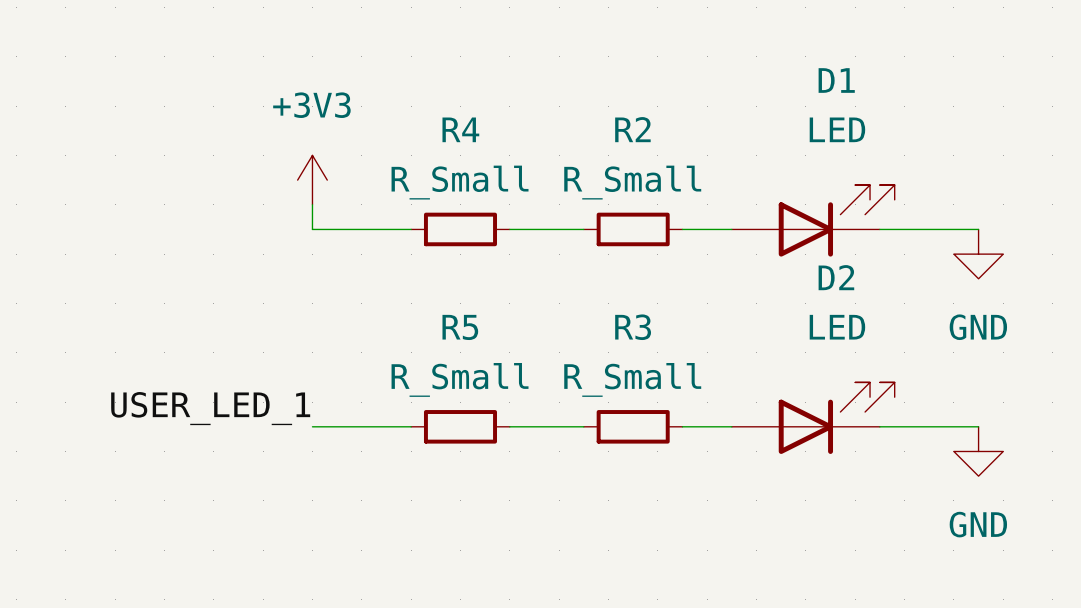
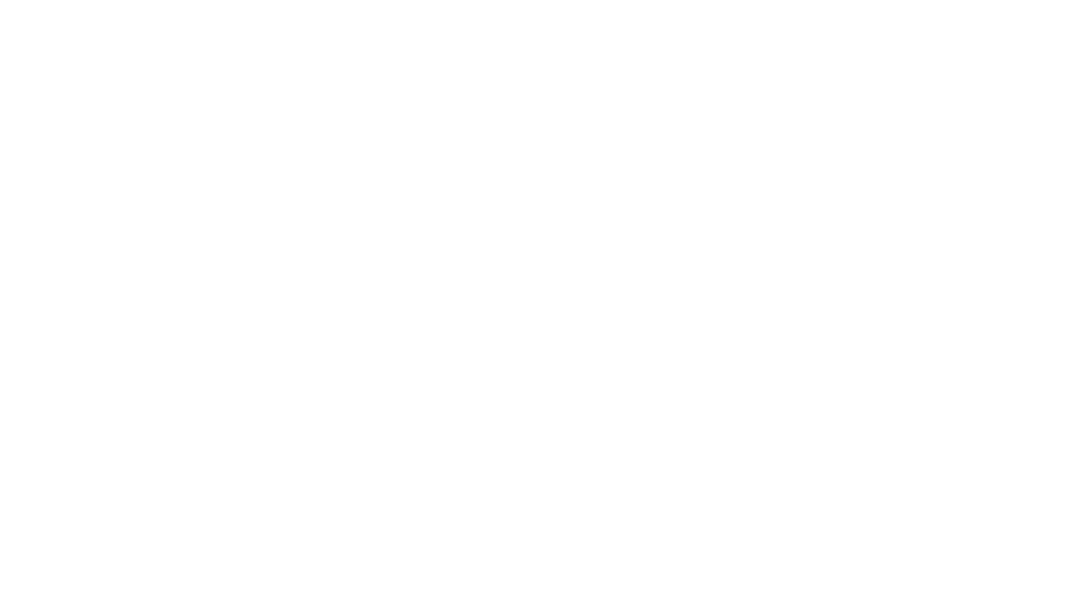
power symbol: +3V3 (312, 180) -> none
wire: (312, 204) (312, 229) (411, 229) -> none
D1: LED (813, 220) -> none
R4: R_Small (460, 229) -> none
wire: (509, 229) (583, 229) -> none
R2: R_Small (633, 229) -> none
wire: (682, 229) (731, 229) -> none
wire: (879, 229) (978, 229) -> none
power symbol: GND (978, 254) -> none
label: USER_LED_1 (210, 408) -> none
D2: LED (813, 418) -> none
wire: (312, 426) (411, 426) -> none
R5: R_Small (460, 426) -> none
wire: (509, 426) (583, 426) -> none
R3: R_Small (633, 426) -> none
wire: (682, 426) (731, 426) -> none
wire: (879, 426) (978, 426) -> none
power symbol: GND (978, 451) -> none

